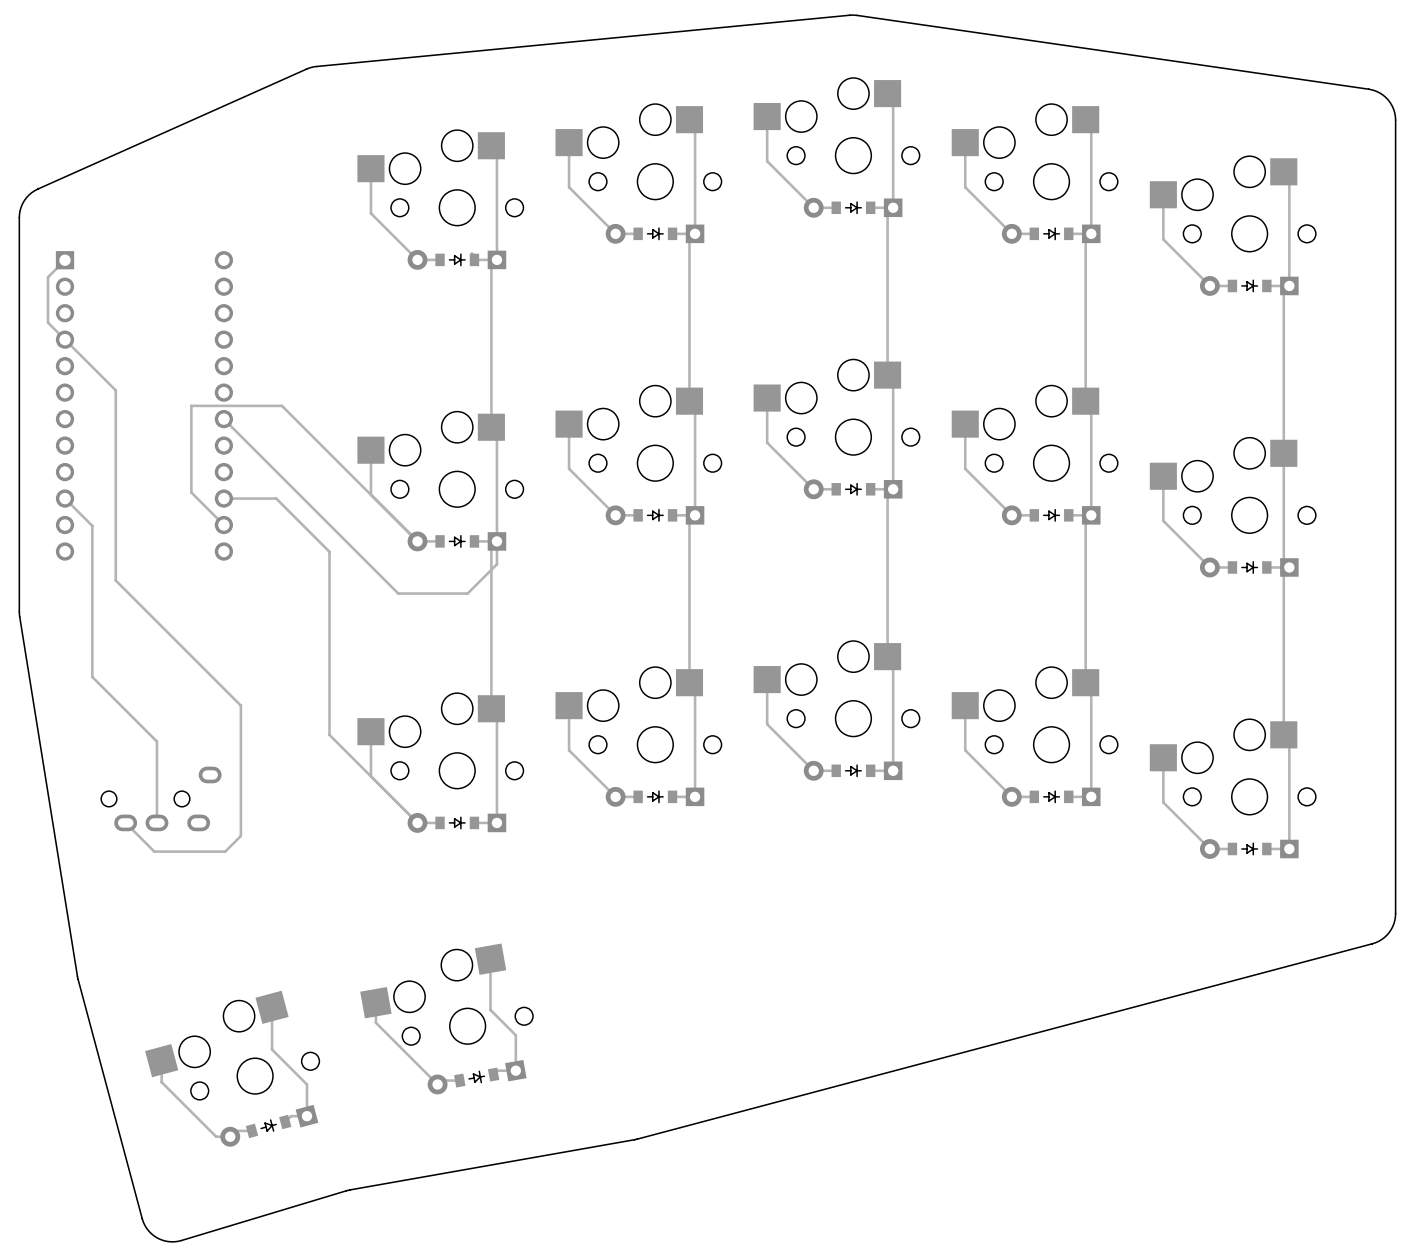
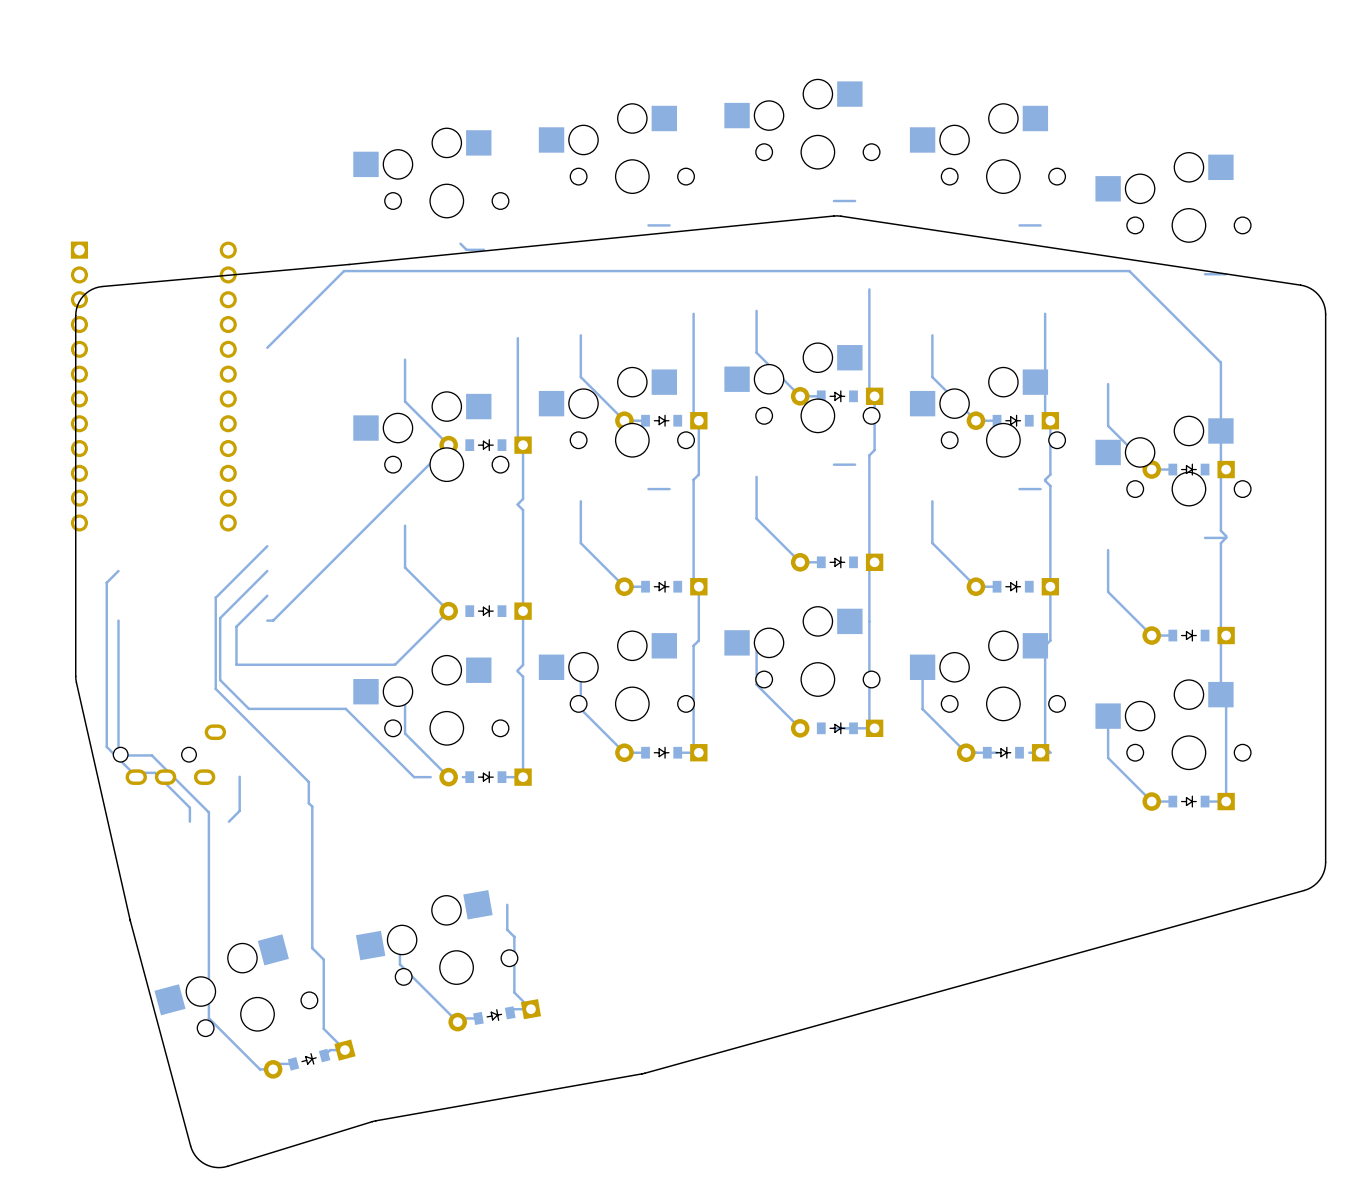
track: (887, 93) (893, 99) (893, 207) (887, 213) (887, 375) (893, 380) (893, 489) (887, 494) (887, 656) (893, 662) (893, 770) -> (869, 289) (869, 391) (874, 396) (874, 450) (869, 455) (869, 557) (874, 562) (869, 568) (869, 723) (874, 728) (855, 728)
track: (767, 116) (767, 161) (813, 207) (836, 207) -> none
track: (689, 119) (695, 125) (695, 233) (689, 239) (689, 401) (695, 406) (695, 515) (689, 520) (689, 682) (695, 688) (695, 796) (672, 796) -> none
track: (1085, 119) (1091, 125) (1091, 233) (1085, 239) (1085, 401) (1091, 406) (1091, 515) (1085, 520) (1085, 682) (1091, 688) (1091, 796) -> (1045, 313) (1045, 415) (1050, 420) (1050, 474) (1045, 479) (1050, 485) (1050, 640) (1045, 645) (1045, 747) (1050, 752) (1040, 752)
track: (569, 142) (569, 187) (615, 233) (638, 233) -> none
track: (965, 142) (965, 187) (1011, 233) (1034, 233) -> none
track: (491, 145) (496, 151) (496, 259) (491, 265) (491, 427) (496, 432) (496, 564) (467, 593) (398, 593) (223, 419) -> none
track: (370, 168) (370, 213) (417, 259) (440, 259) -> none
track: (1283, 171) (1289, 177) (1289, 285) (1283, 291) (1283, 380) -> (267, 347) (344, 271) (1129, 271) (1220, 362)
track: (1163, 194) (1163, 239) (1209, 285) (1232, 285) -> none
part: (853, 207) -> none
part: (655, 233) -> none
part: (1051, 233) -> none
part: (456, 259) -> none
track: (65, 260) (48, 277) (48, 322) (115, 390) (115, 580) (240, 705) (240, 835) (225, 851) (154, 851) (125, 822) -> none
part: (1249, 285) -> none
track: none -> (693, 313) (693, 415) (698, 420) (698, 474) (693, 479) (693, 581) (698, 586) (698, 640) (693, 645) (693, 747) (698, 752) (677, 752)
board edge: (1395, 328) (1395, 116) (1390, 102) (1379, 92) (1368, 89) (853, 15) (311, 67) (37, 189) (26, 197) (19, 214) (19, 616) (77, 977) (142, 1218) (148, 1231) (157, 1237) (167, 1241) (181, 1240) (350, 1189) (637, 1139) (1372, 943) (1381, 939) (1389, 932) (1393, 923) (1395, 913) -> (1325, 314) (1323, 303) (1318, 295) (1310, 288) (1300, 285) (837, 215) (349, 264) (102, 286) (92, 289) (83, 295) (77, 305) (75, 315) (75, 679) (130, 920) (190, 1145) (196, 1157) (207, 1165) (217, 1167) (227, 1166) (374, 1121) (644, 1073) (1304, 890) (1319, 880) (1324, 869) (1325, 862)
track: none -> (517, 338) (517, 439) (523, 445) (523, 498) (517, 504) (523, 510) (523, 664) (517, 671) (523, 676) (523, 777) (501, 777)
track: none -> (405, 359) (405, 401) (448, 445) (273, 620) (267, 620)
track: (767, 398) (767, 442) (813, 489) (836, 489) -> (756, 310) (756, 352) (800, 396) (821, 396)
part: none -> (837, 396)
track: (569, 424) (569, 468) (615, 515) (638, 515) -> (580, 335) (580, 377) (624, 420) (645, 420)
track: (965, 424) (965, 468) (1011, 515) (1034, 515) -> (932, 335) (932, 377) (975, 420) (997, 420)
part: none -> (661, 420)
part: none -> (1012, 420)
track: (370, 450) (370, 494) -> none
part: none -> (485, 445)
track: (1163, 476) (1163, 520) (1209, 567) (1232, 567) -> (1108, 384) (1108, 425) (1151, 469) (1172, 469)
part: (853, 489) -> none
part: none -> (1188, 469)
track: (65, 498) (92, 525) (92, 676) (156, 741) (156, 822) -> none
track: (223, 498) (276, 498) (329, 551) (329, 734) (417, 822) (422, 822) -> (267, 571) (220, 618) (220, 680) (248, 708) (345, 708) (414, 777)
track: none -> (756, 476) (756, 518) (800, 562) (821, 562)
part: (655, 515) -> none
part: (1051, 515) -> none
track: (223, 525) (191, 492) (191, 405) (281, 405) (417, 541) (440, 541) -> none
track: none -> (580, 501) (580, 543) (624, 586) (645, 586)
track: none -> (932, 501) (932, 543) (975, 586) (997, 586)
part: (456, 541) -> none
track: (474, 541) (496, 541) (491, 546) (491, 708) (496, 714) (496, 822) (481, 822) -> none
track: none -> (405, 525) (405, 567) (448, 611) (395, 664) (236, 664) (236, 626) (267, 595)
part: (1249, 567) -> none
track: none -> (267, 546) (215, 597) (215, 688) (308, 782) (308, 803) (312, 806) (312, 948) (323, 959) (323, 1028) (344, 1050) (330, 1050) (324, 1055)
track: none -> (1108, 550) (1108, 591) (1151, 635) (1172, 635)
part: none -> (837, 562)
track: none -> (118, 571) (106, 582) (106, 746) (132, 772) (155, 772) (189, 807) (189, 821)
part: none -> (661, 586)
part: none -> (1012, 586)
part: none -> (485, 611)
track: none -> (118, 620) (118, 752) (121, 755) (151, 755) (208, 812) (208, 1018) (259, 1069) (273, 1069) (278, 1063) (293, 1063)
part: none -> (1188, 635)
track: (767, 679) (767, 724) (813, 770) (834, 770) -> (756, 642) (756, 684) (800, 728)
track: (569, 705) (569, 750) (615, 796) (638, 796) -> (580, 667) (580, 709) (624, 752) (645, 752)
track: (370, 731) (370, 776) -> none
track: none -> (405, 691) (405, 733) (448, 777)
part position: (853, 770) -> (837, 728)
part position: (655, 796) -> (661, 752)
track: (1079, 796) (1068, 796) -> (997, 752) (987, 752)
track: none -> (239, 776) (239, 810) (228, 821)
part position: (456, 822) -> (485, 777)
track: (490, 959) (490, 1009) (515, 1035) (515, 1070) (497, 1070) (493, 1074) -> none
track: none -> (507, 904) (507, 929) (514, 936) (514, 992) (530, 1009) (513, 1009) (510, 1012)
track: (375, 1002) (375, 1022) (437, 1084) (441, 1080) (459, 1080) -> (399, 945) (399, 964) (457, 1022) (461, 1018) (478, 1018)
track: (272, 1007) (272, 1049) (306, 1084) (306, 1116) (291, 1116) (285, 1122) -> none
track: (161, 1060) (161, 1082) (216, 1136) (230, 1136) (236, 1130) (252, 1130) -> none
part position: (477, 1077) -> (494, 1015)
part position: (269, 1125) -> (309, 1059)

